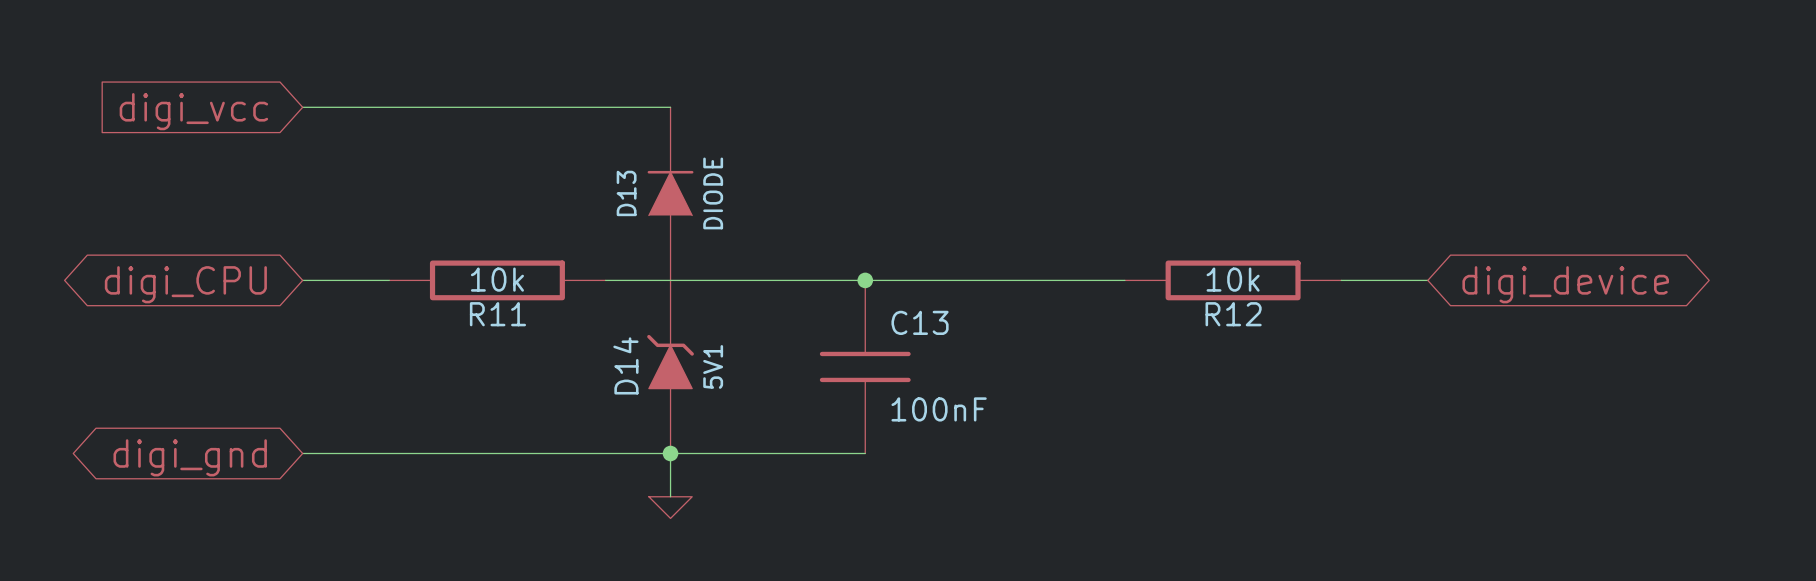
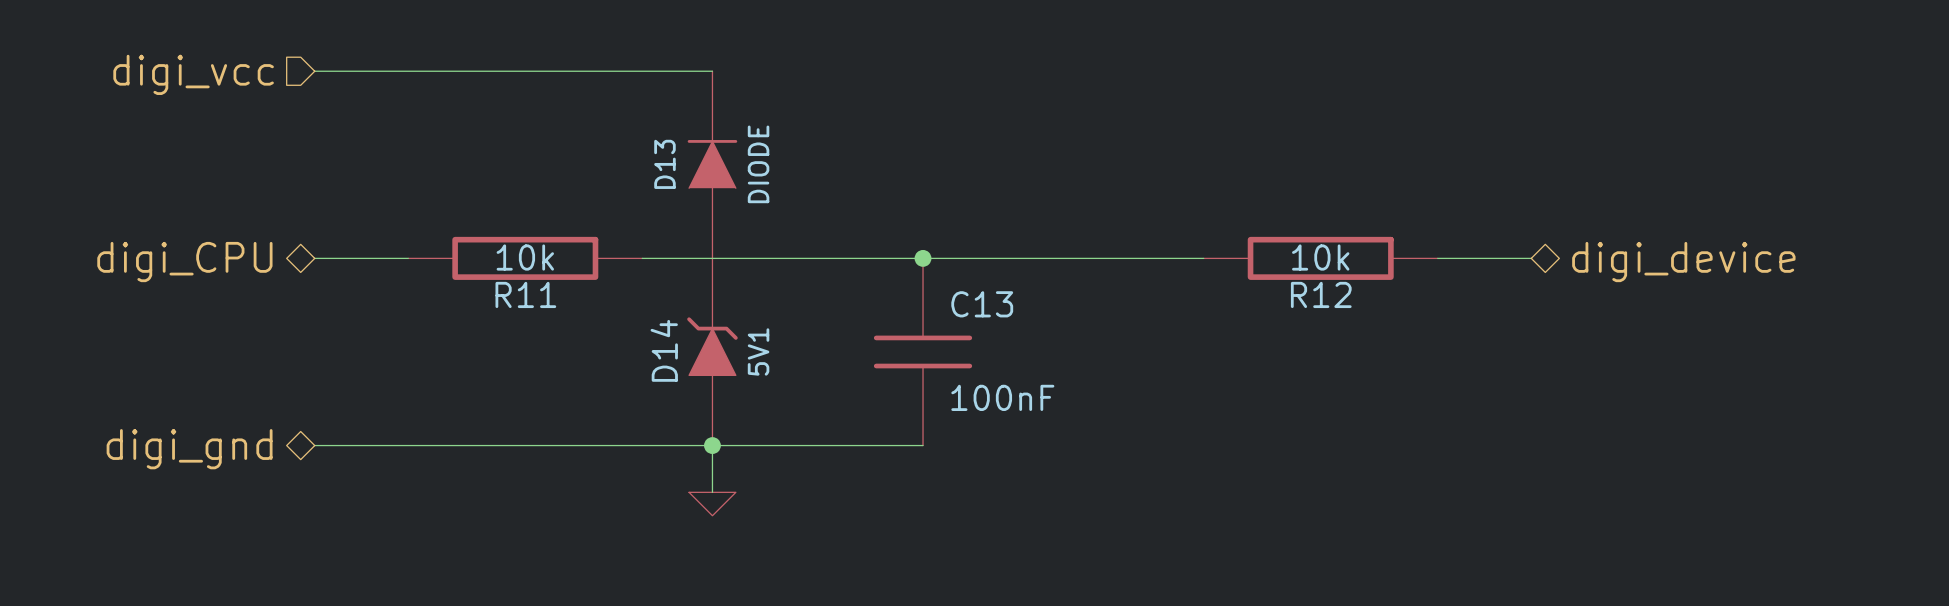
hierarchical label: none -> digi_vcc (193, 74)
global label: digi_vcc (193, 111) -> none
hierarchical label: none -> digi_CPU (184, 262)
hierarchical label: none -> digi_device (1683, 262)
global label: digi_CPU (185, 284) -> none
global label: digi_device (1565, 284) -> none
hierarchical label: none -> digi_gnd (189, 449)
global label: digi_gnd (190, 457) -> none

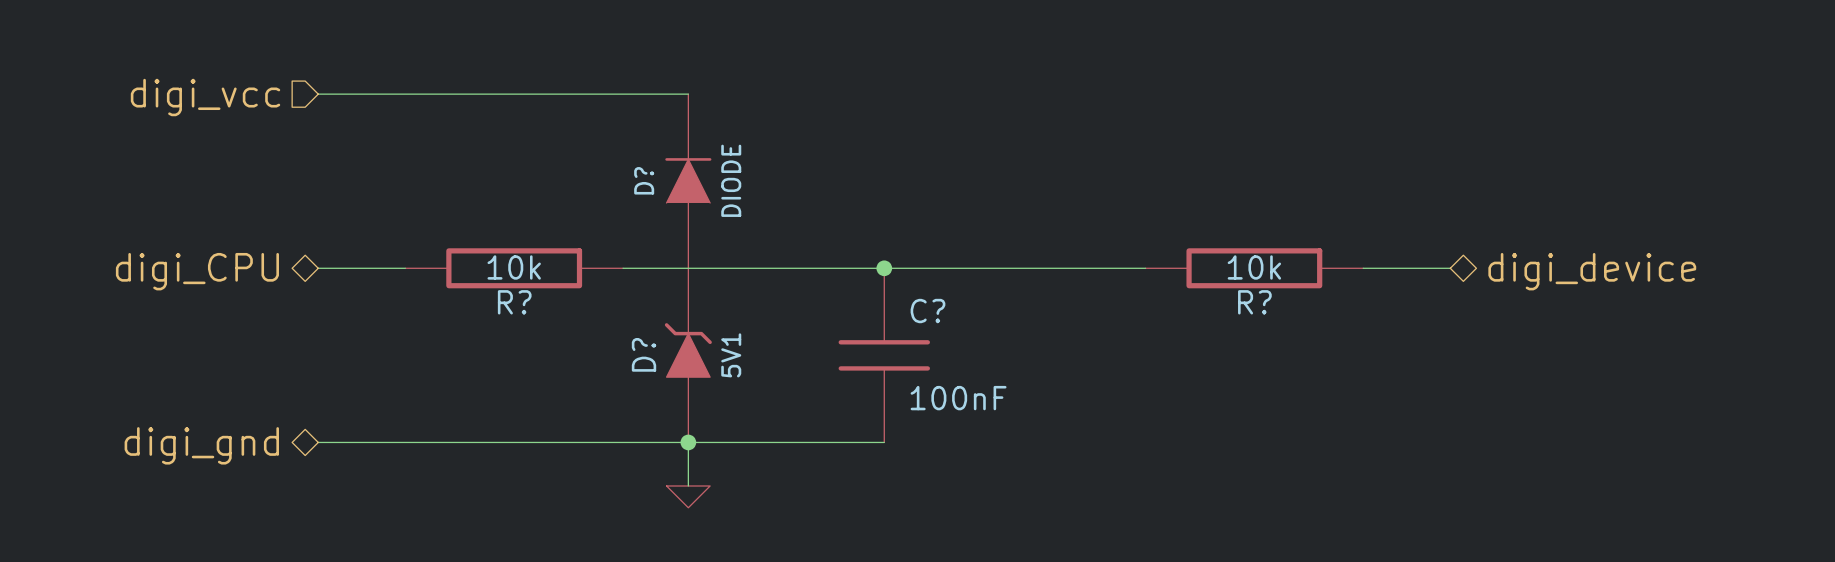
D13 name: D13 (664, 164) -> D? (644, 180)
R11 name: R11 (525, 294) -> R? (514, 302)
R12 name: R12 (1321, 294) -> R? (1254, 302)
C13 name: C13 (982, 304) -> C? (927, 311)
D14 name: D14 (664, 350) -> D? (644, 354)

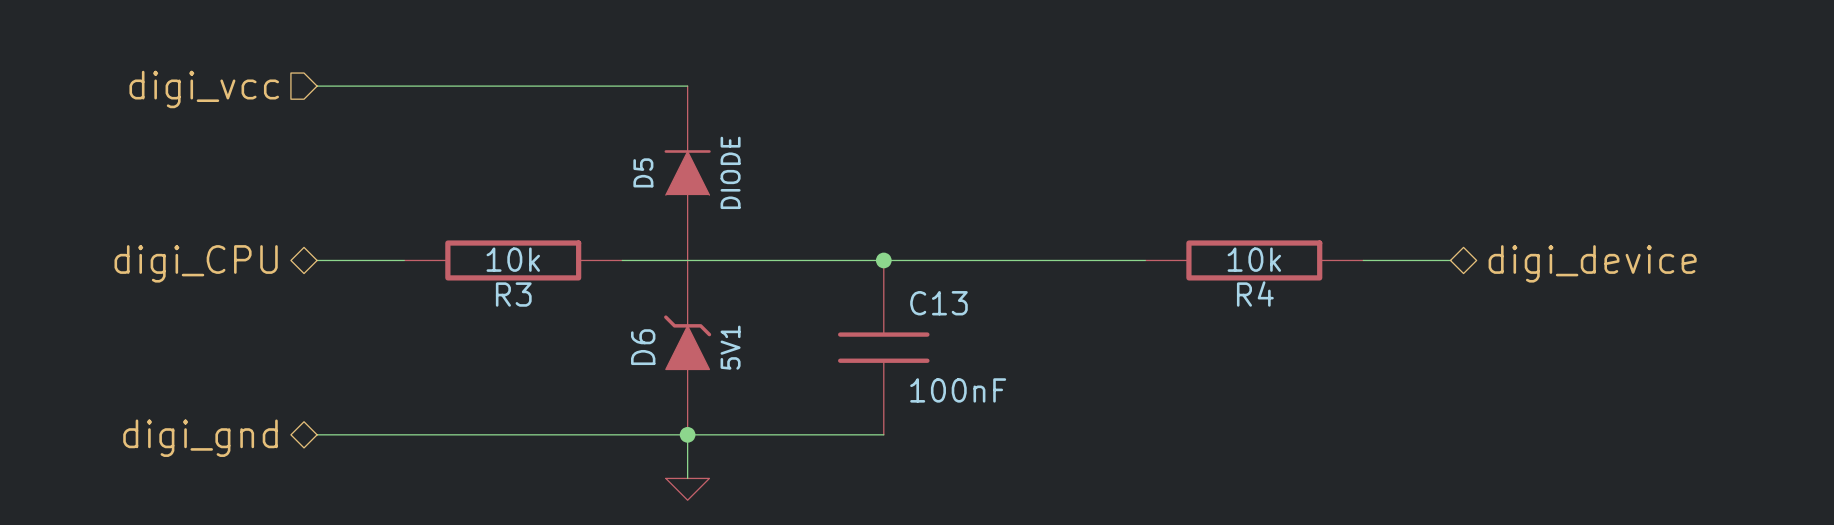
D? name: D? (644, 180) -> D5 (643, 172)
R? name: R? (514, 302) -> R3 (513, 294)
R? name: R? (1254, 302) -> R4 (1255, 294)
C? name: C? (927, 311) -> C13 (938, 303)
D? name: D? (644, 354) -> D6 (643, 347)

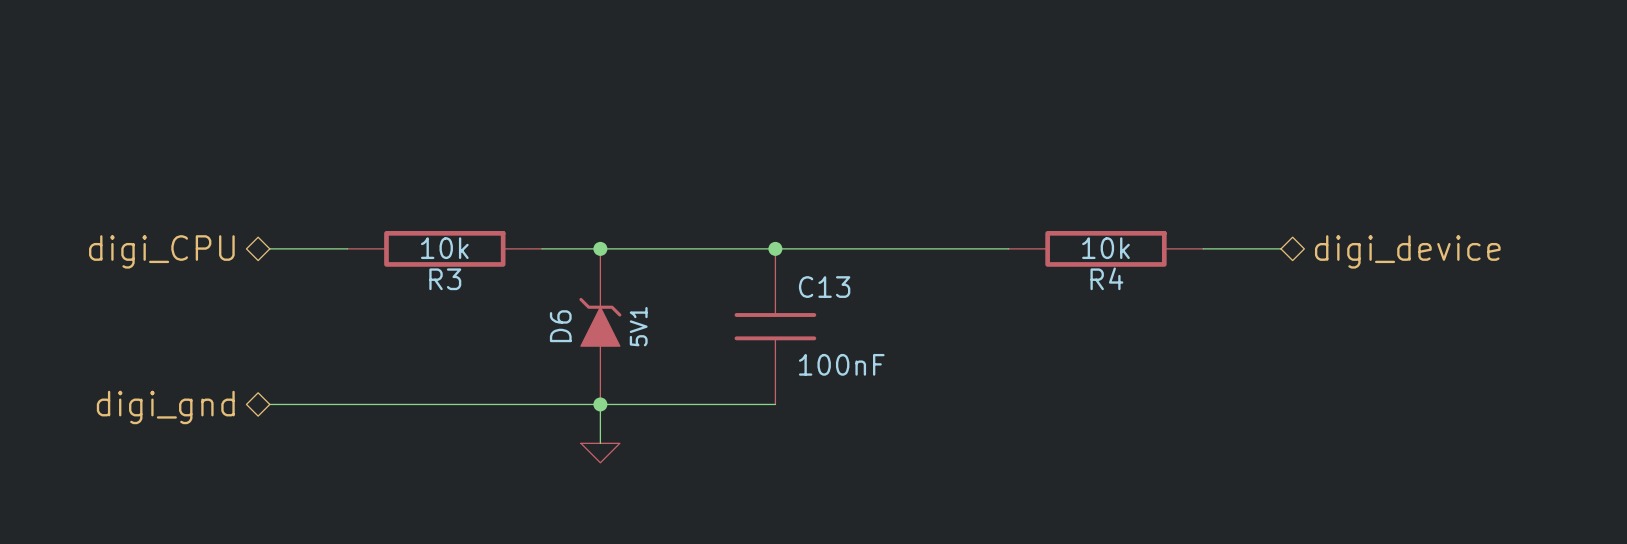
wire: (317, 86) (687, 86) -> none
hierarchical label: digi_vcc (204, 89) -> none
D5: DIODE (687, 173) -> none
junction: none -> (600, 248)

